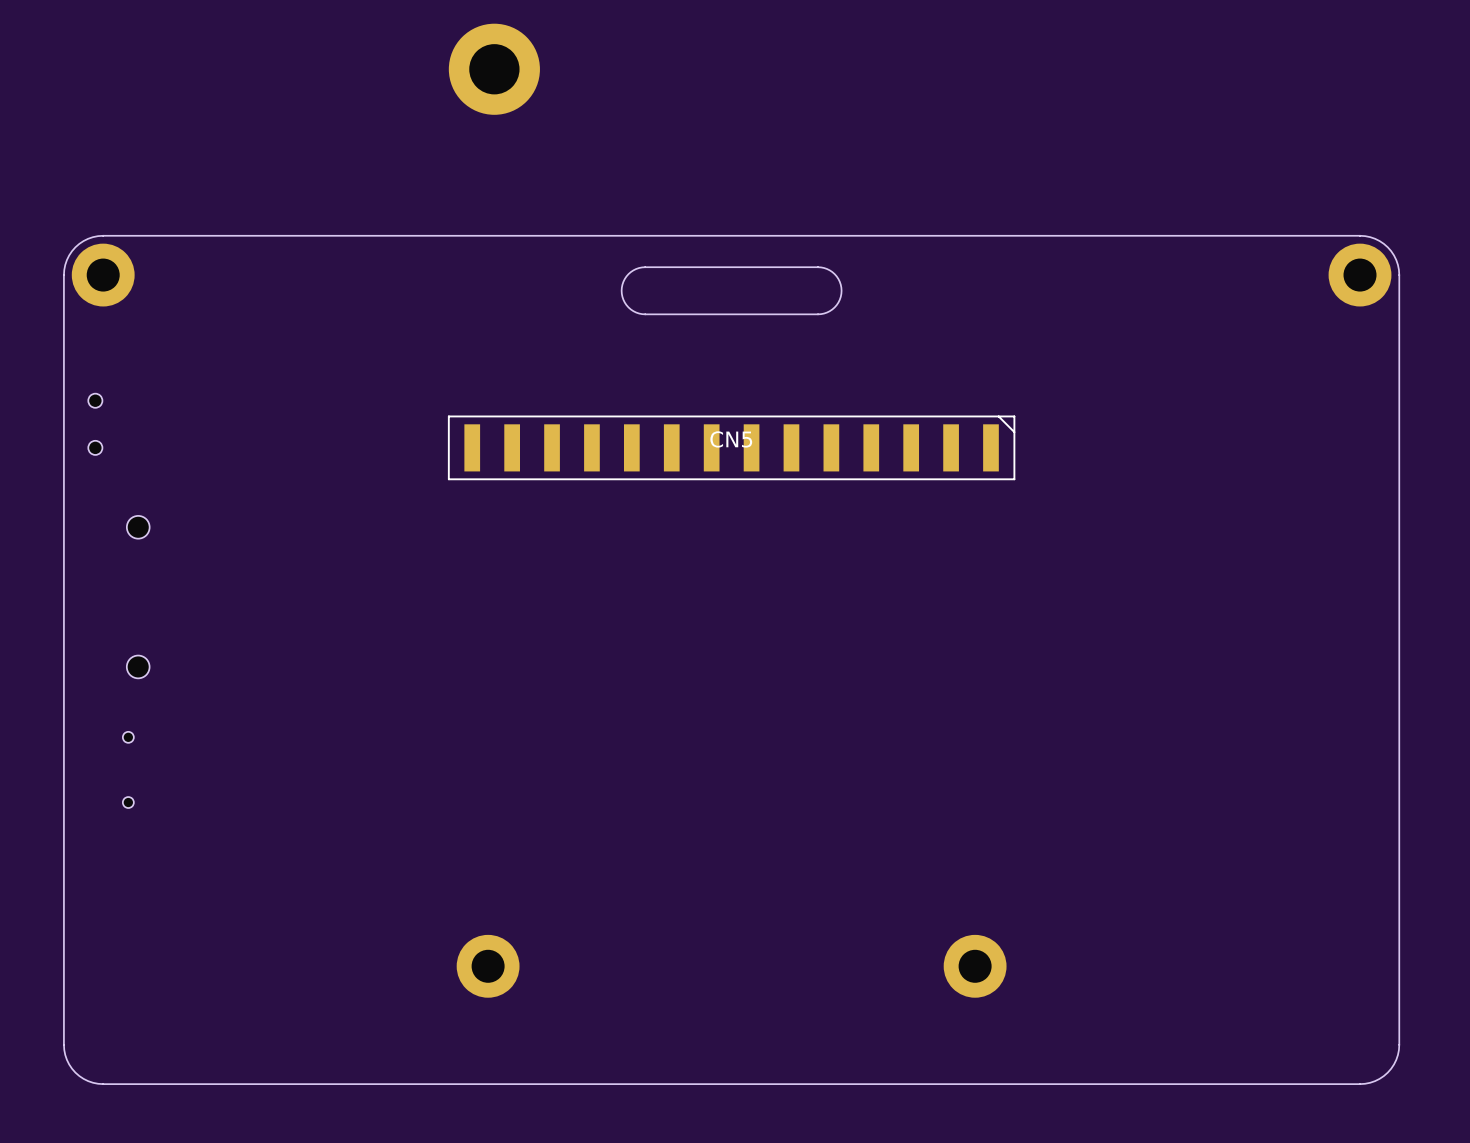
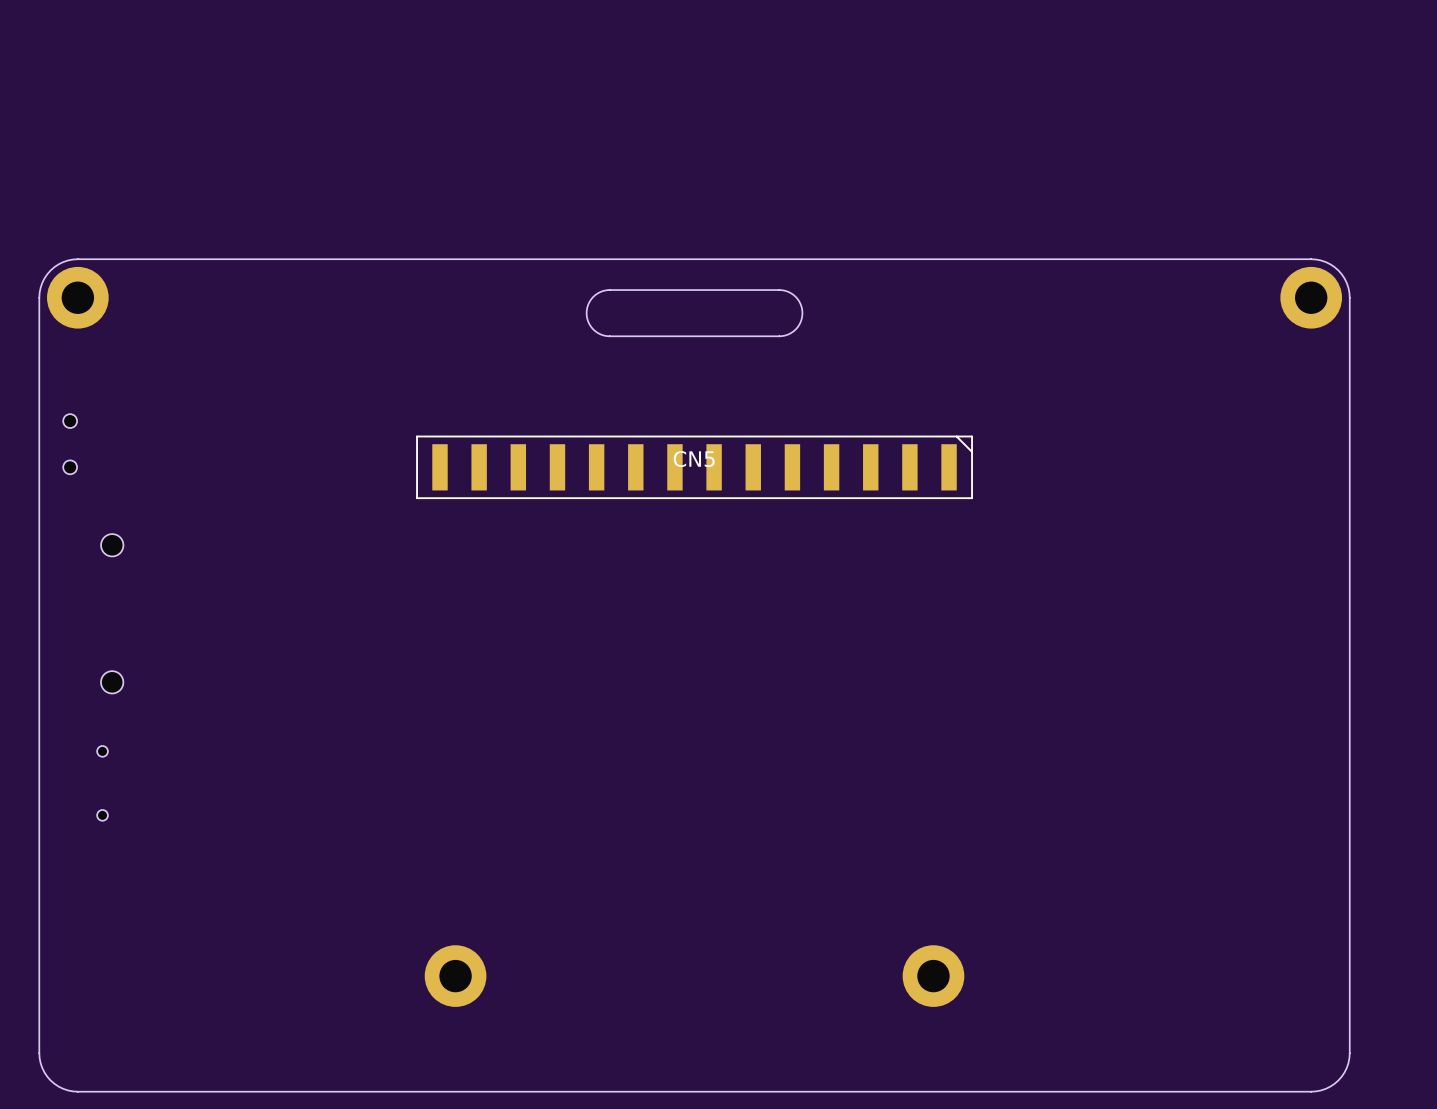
part: (494, 69) -> none

